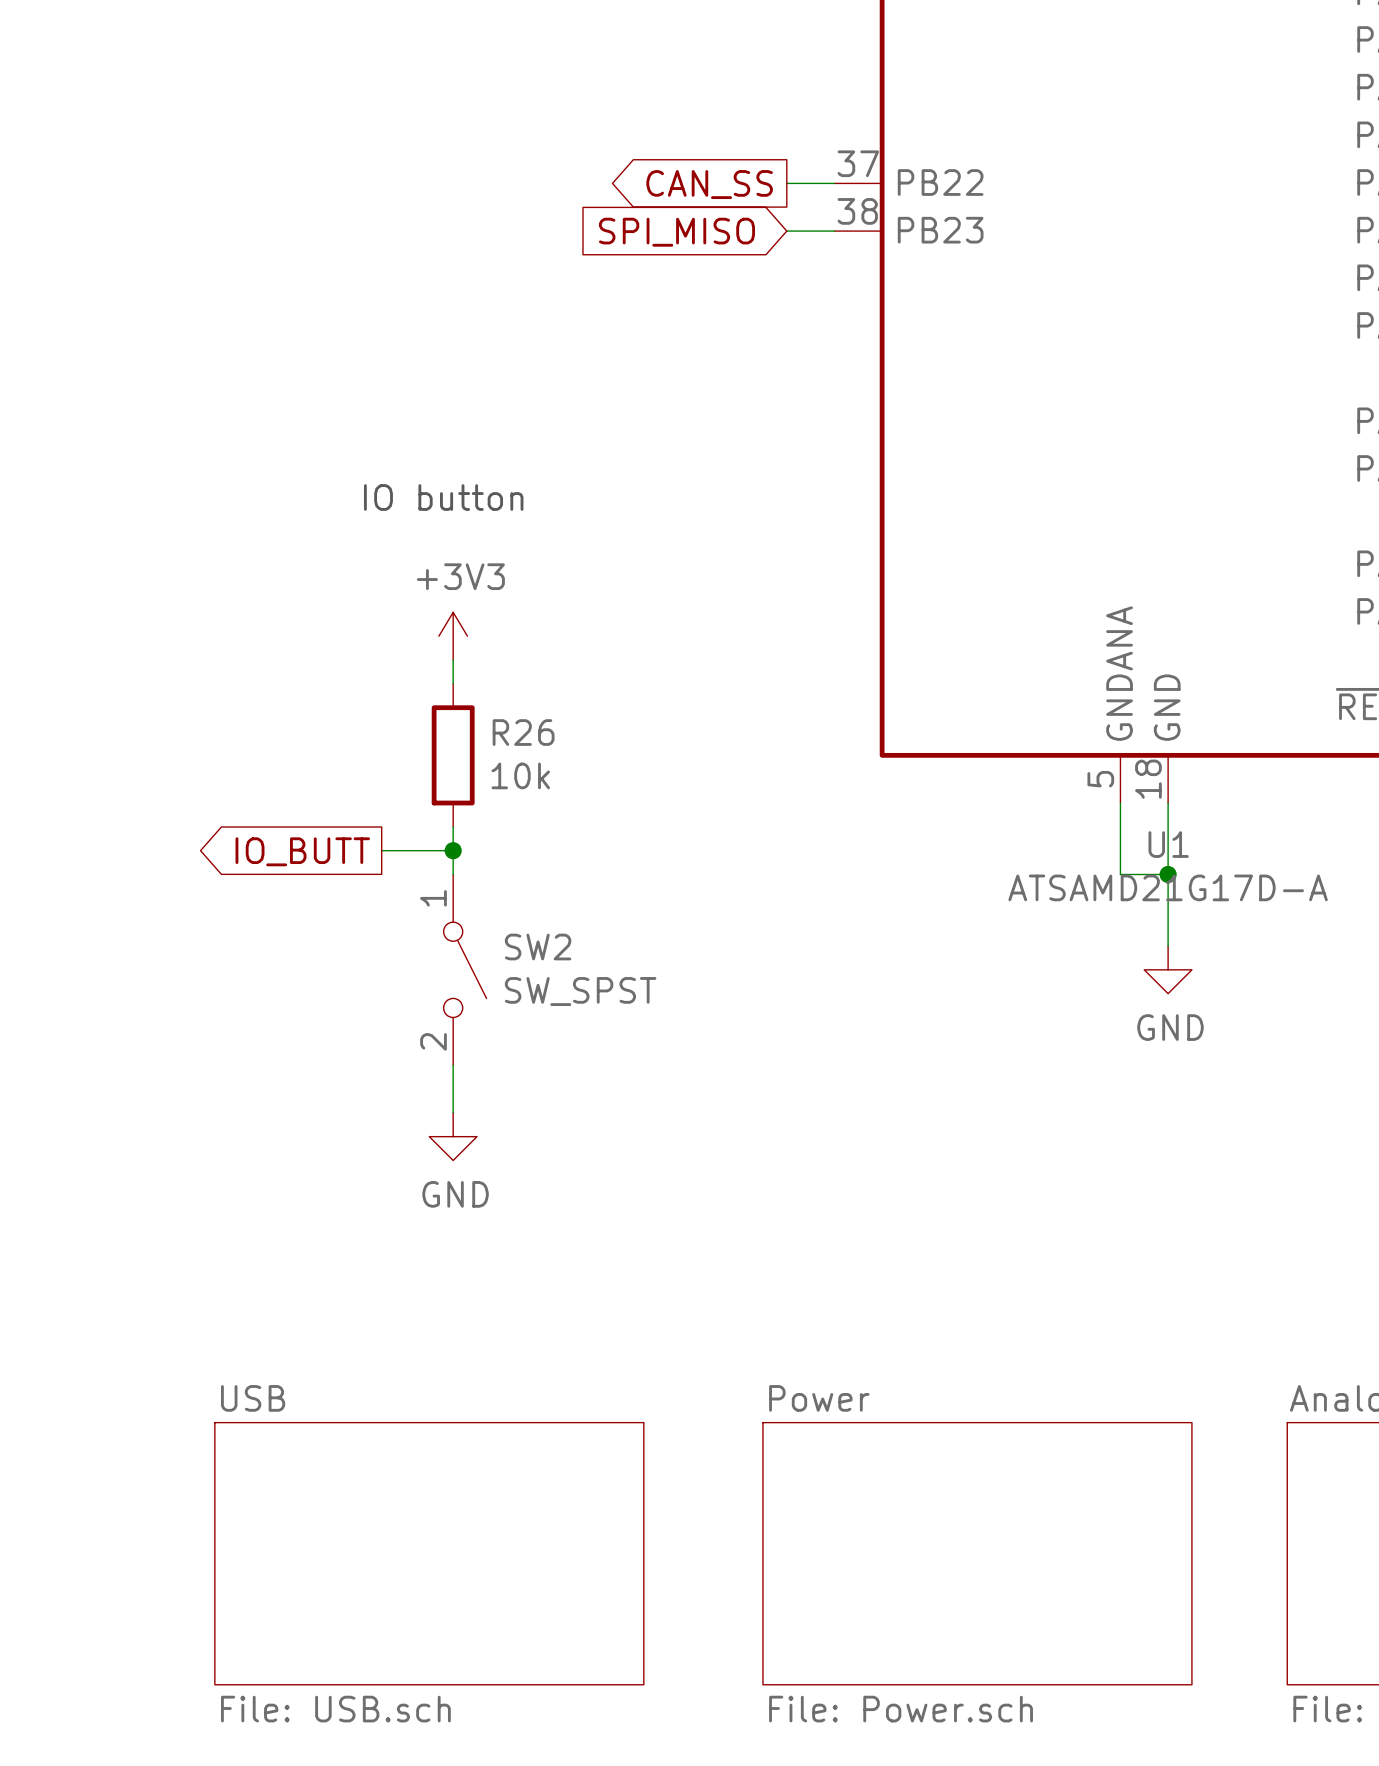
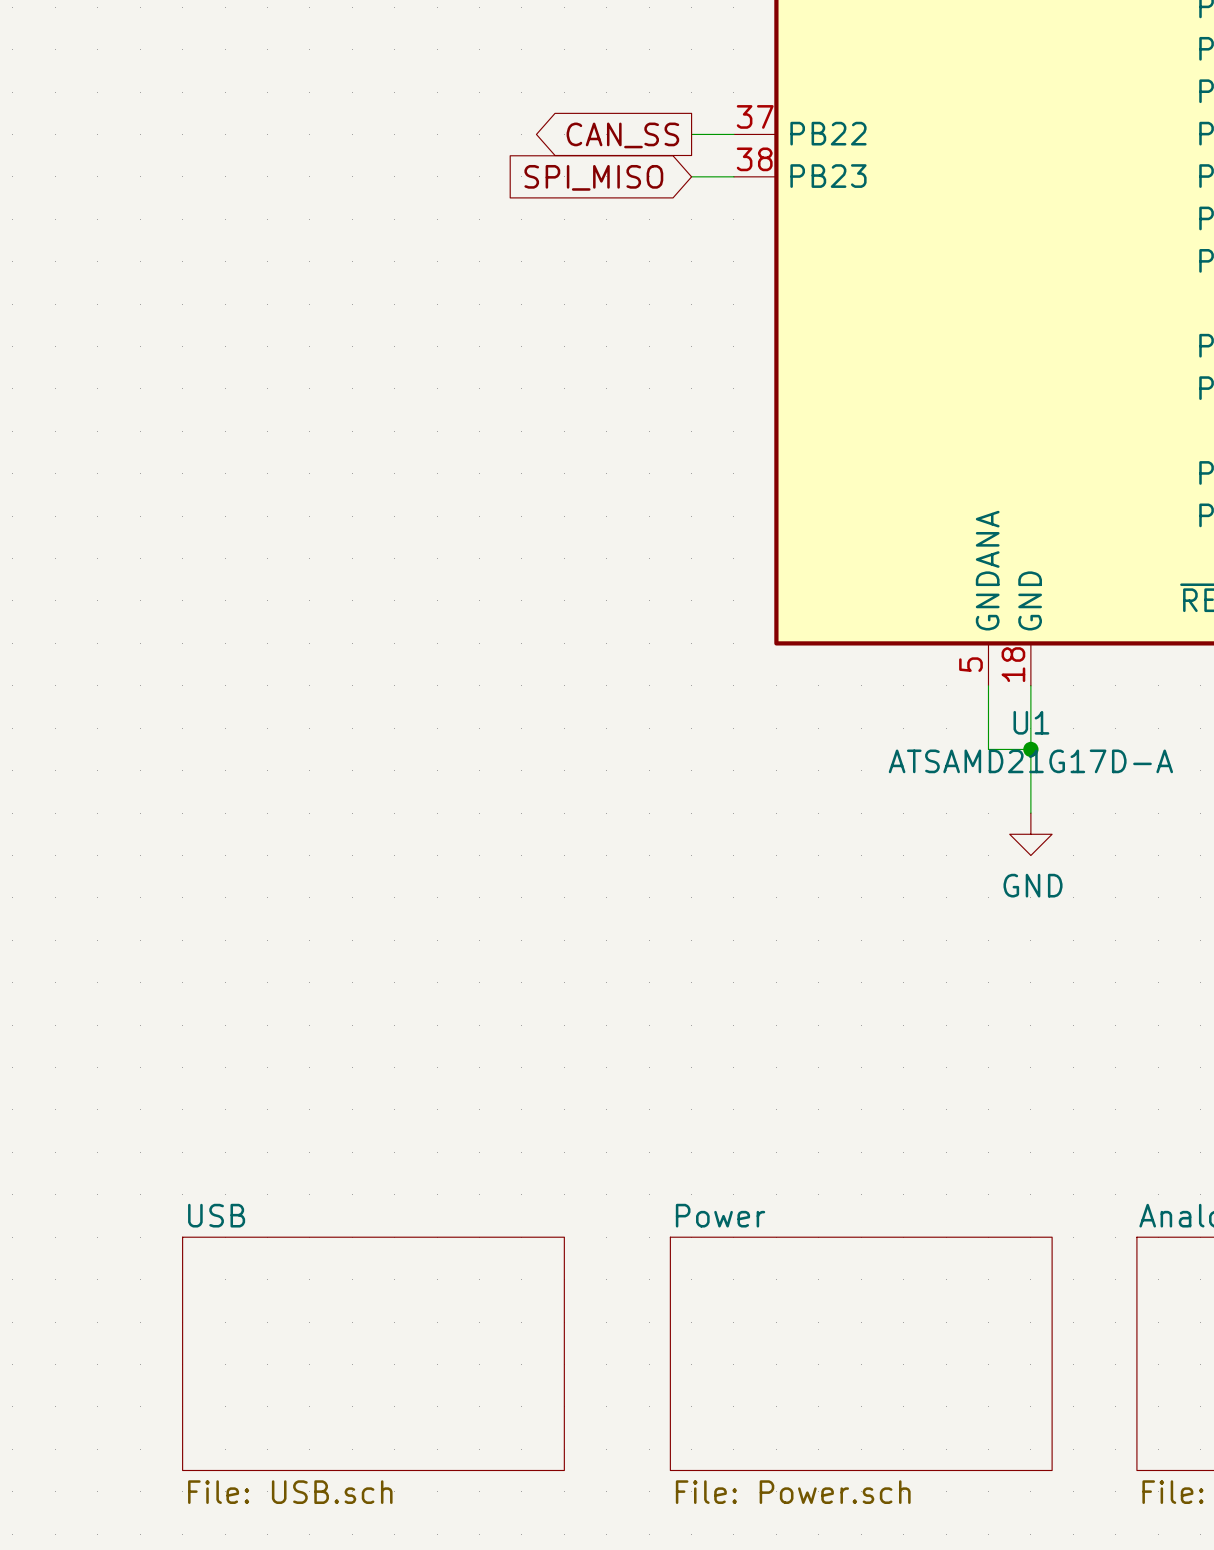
text: IO button (443, 497) -> none
power symbol: +3V3 (453, 636) -> none
wire: (453, 660) (453, 683) -> none
R26: 10k (453, 755) -> none
wire: (453, 826) (453, 874) -> none
wire: (381, 850) (453, 850) -> none
junction: (453, 850) -> none
global label: IO_BUTT (302, 851) -> none
SW2: SW_SPST (465, 969) -> none
wire: (453, 1065) (453, 1112) -> none
power symbol: GND (453, 1136) -> none

